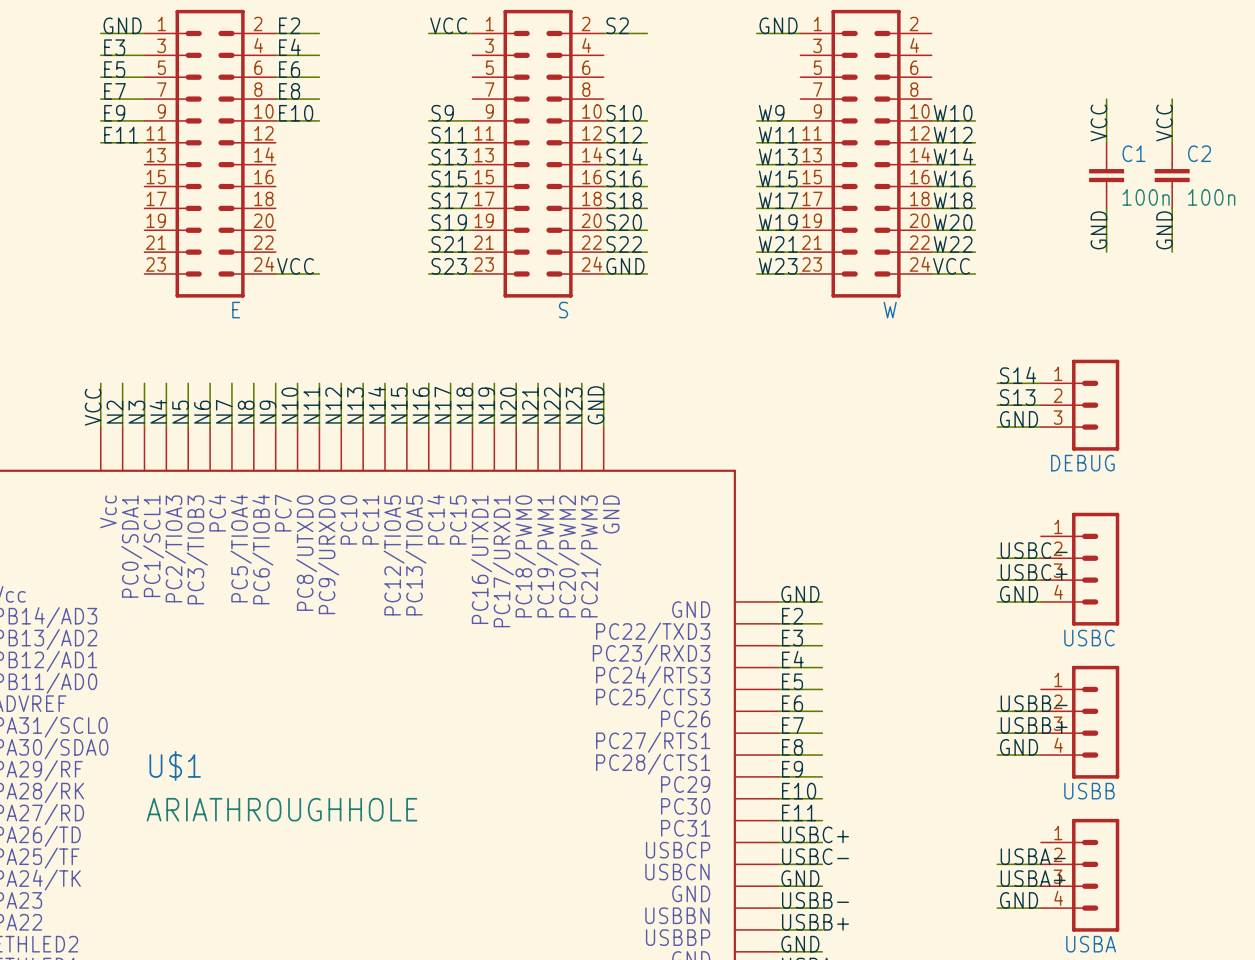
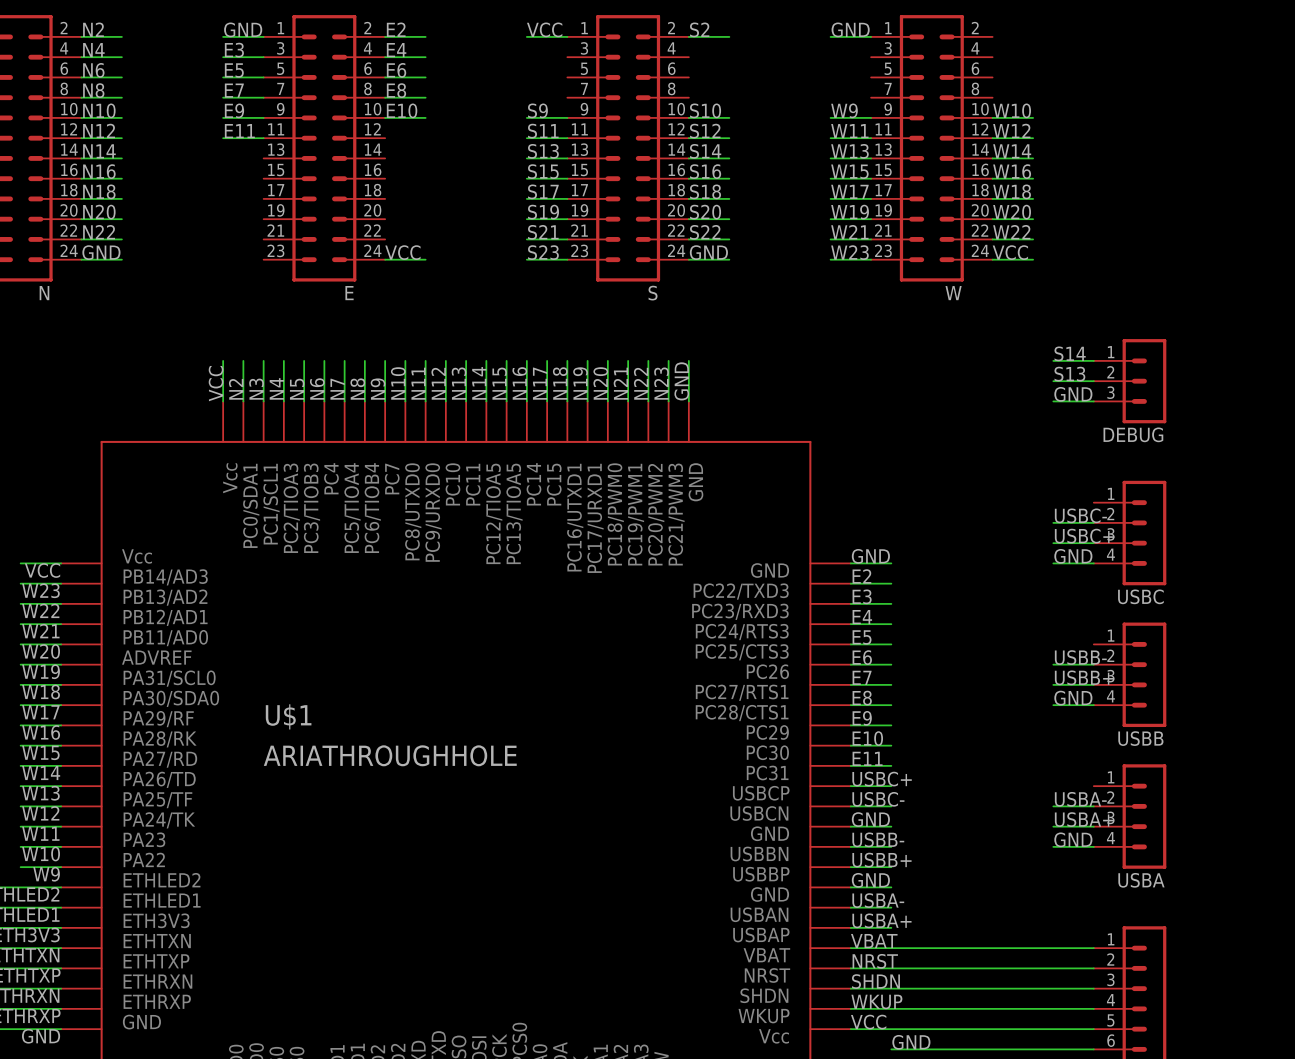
wire: (1106, 99) (1106, 142) -> none
wire: (1172, 99) (1172, 142) -> none
label: VCC (1098, 122) -> none
label: VCC (1164, 122) -> none
C1: 100n (1106, 175) -> none
C2: 100n (1172, 175) -> none
wire: (1106, 208) (1106, 252) -> none
wire: (1172, 208) (1172, 252) -> none
label: GND (1098, 230) -> none
label: GND (1164, 230) -> none

